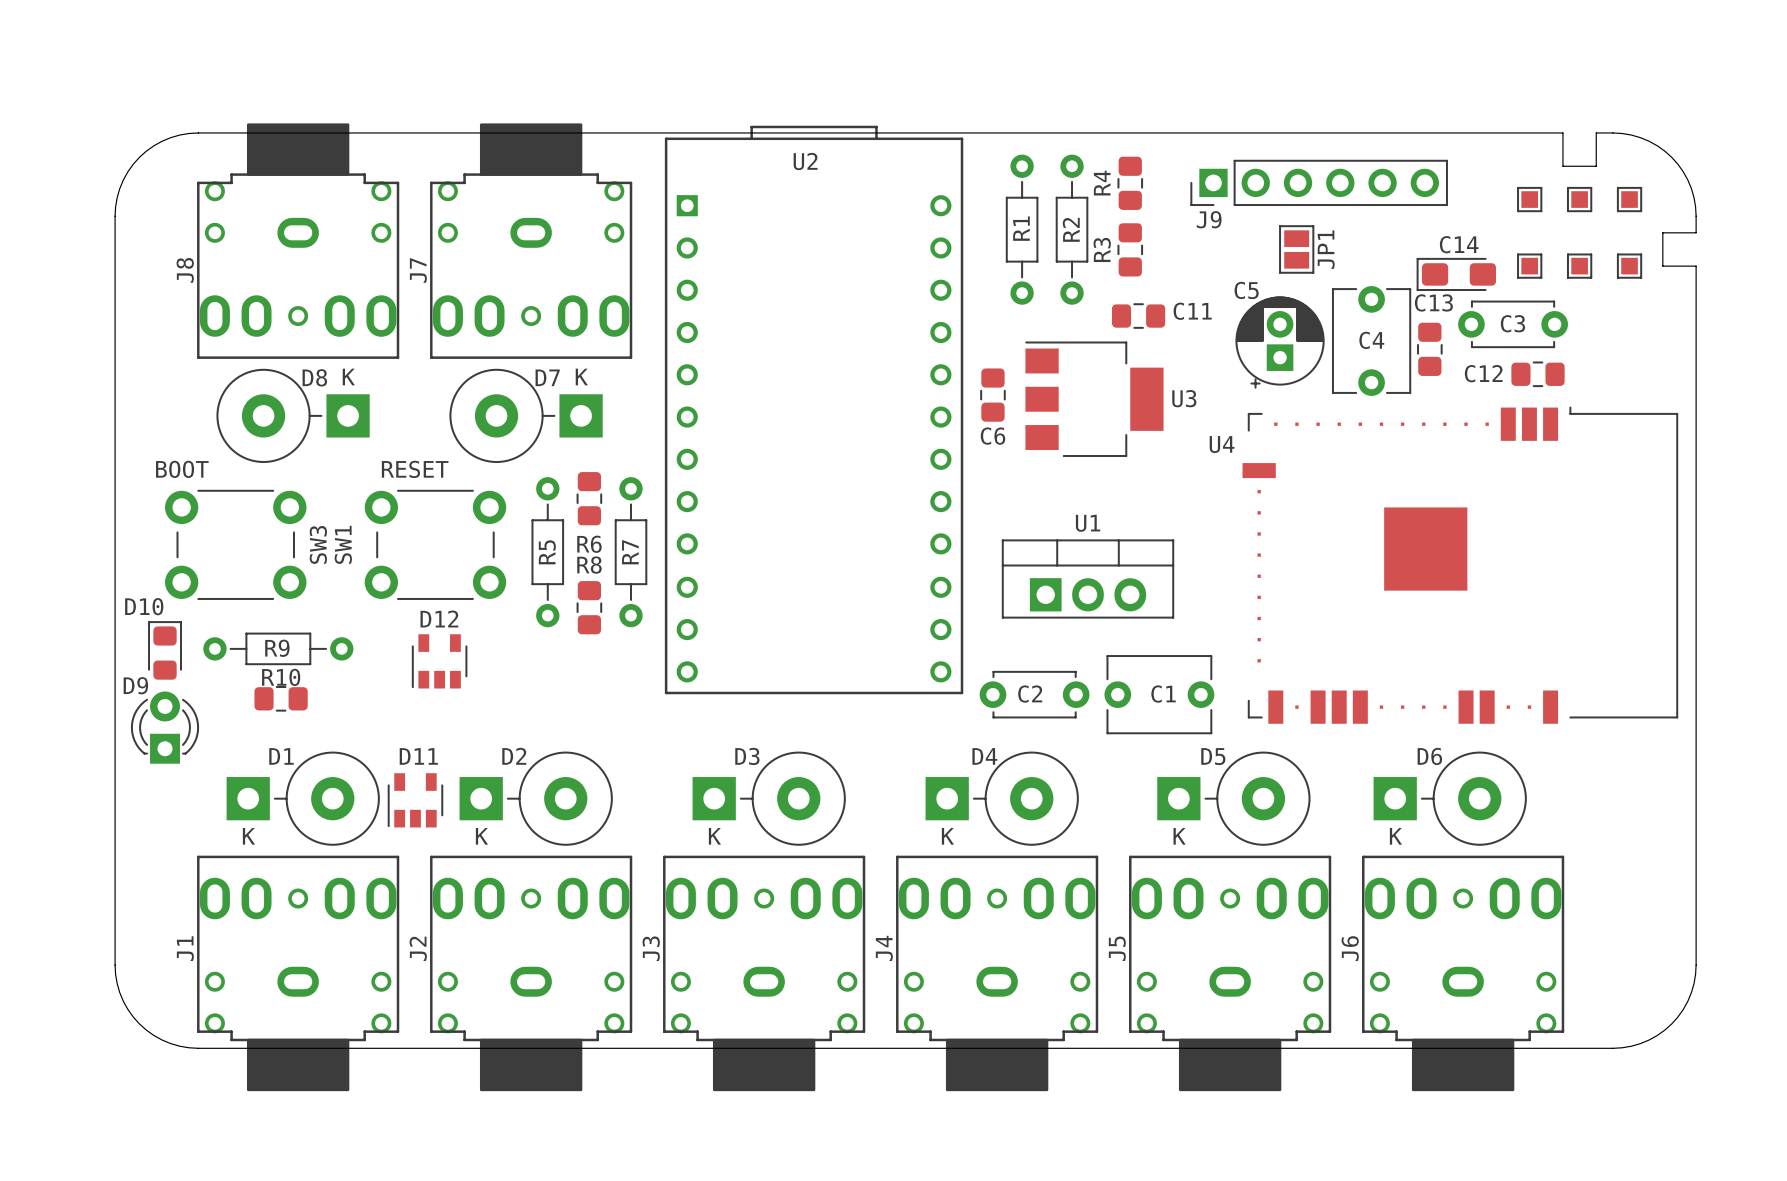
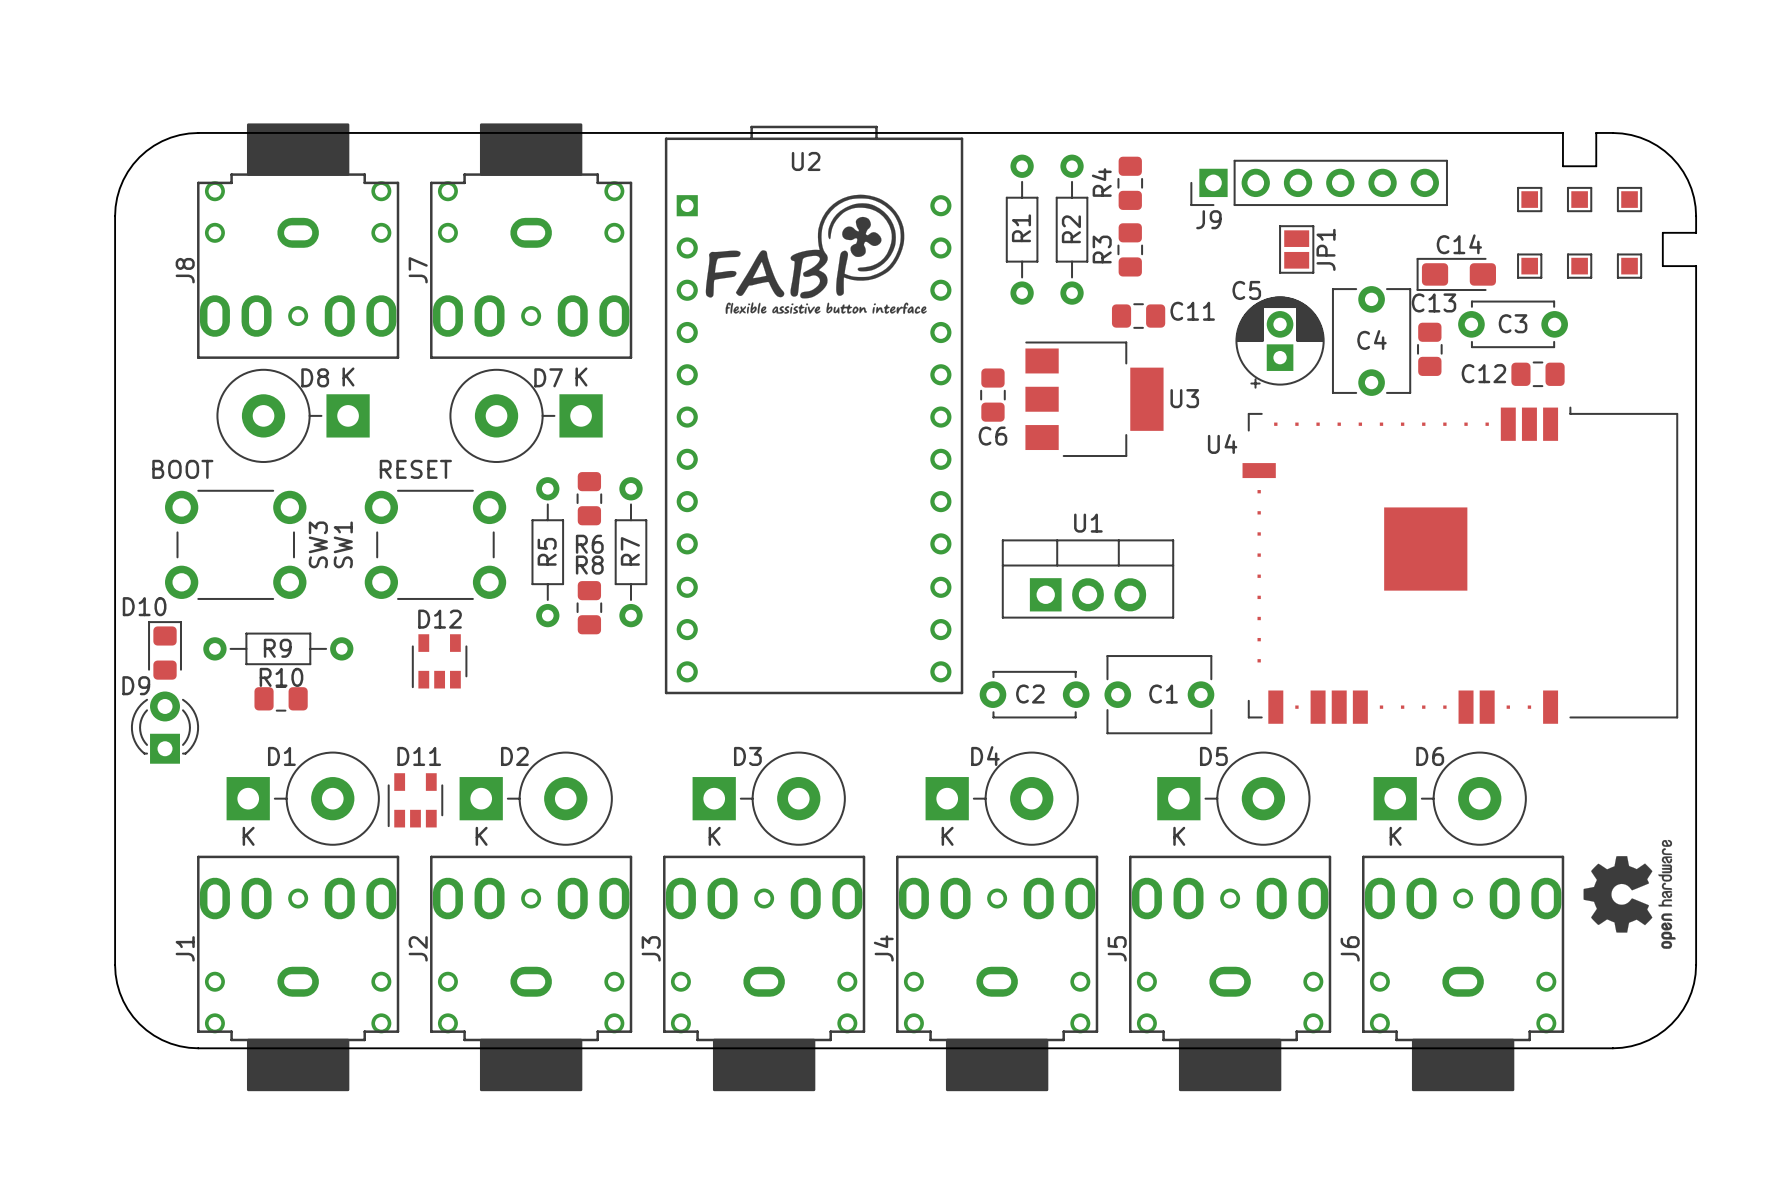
drawing: none -> [705, 194, 927, 315]
drawing: none -> [1583, 839, 1676, 949]

